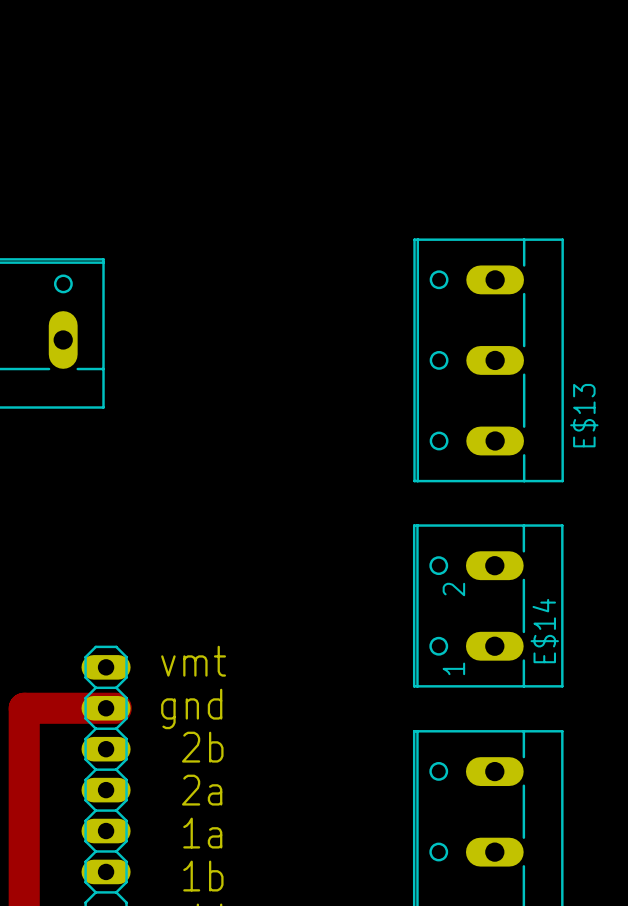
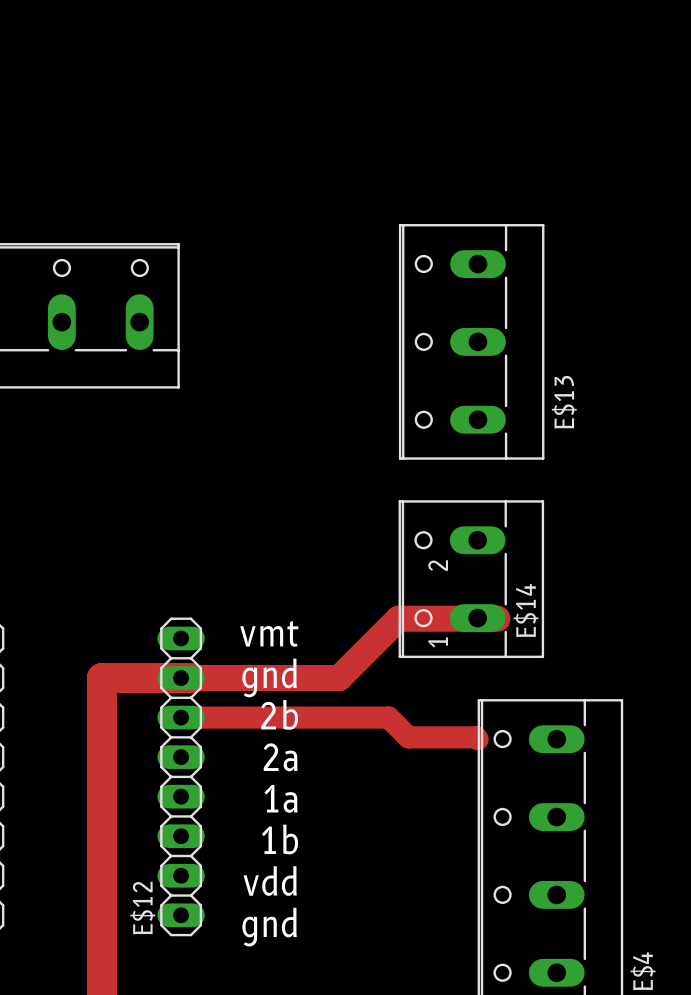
E$13 position: (488, 360) -> (471, 341)
E$14 position: (488, 605) -> (471, 579)
top track: none -> (497, 618) (398, 618) (339, 678) (190, 678)
top track: none -> (181, 717) (388, 717) (408, 737) (475, 737) (477, 739)

